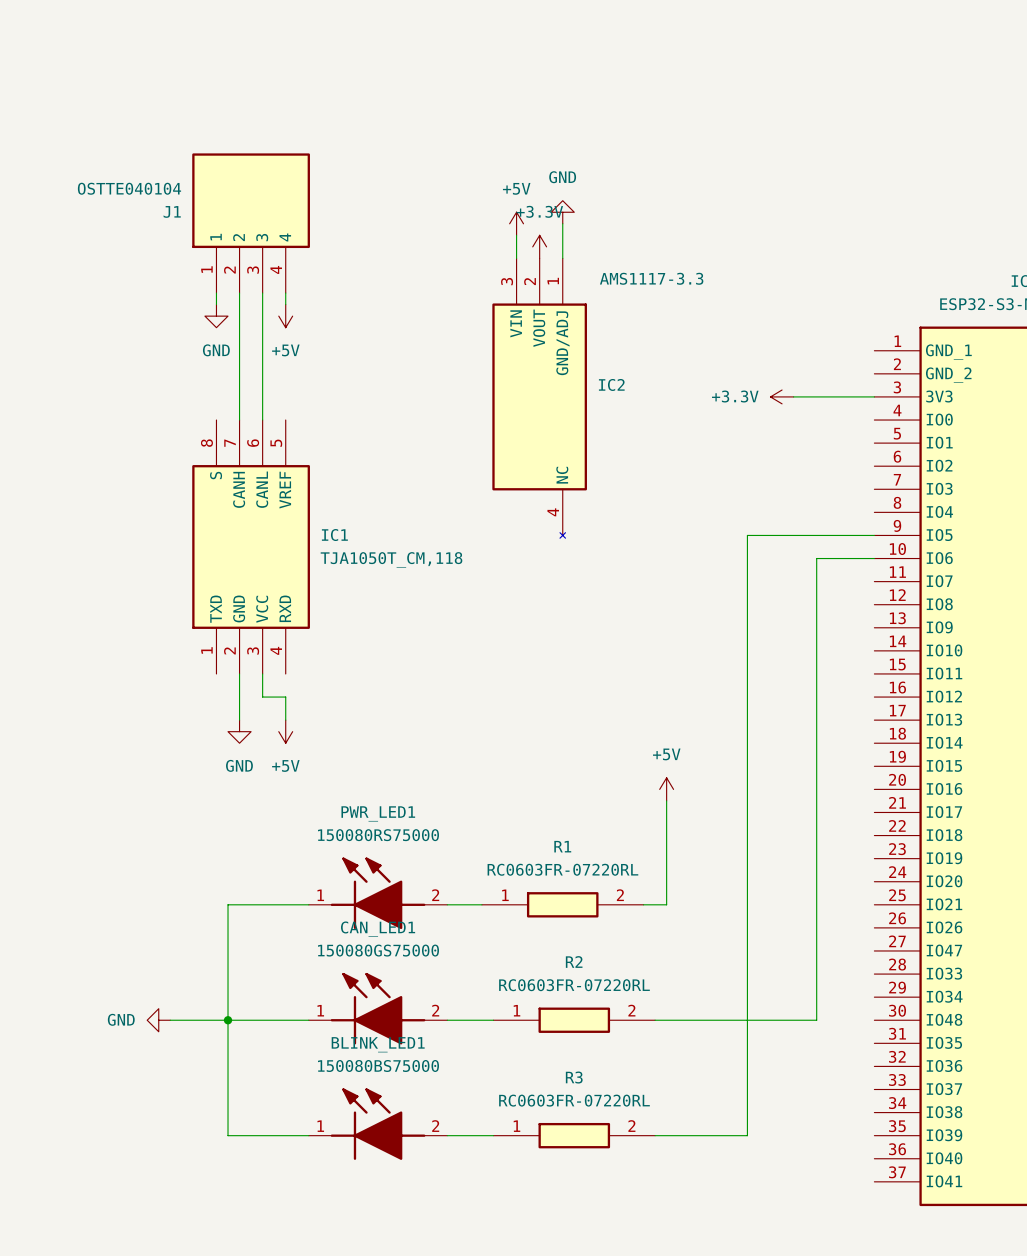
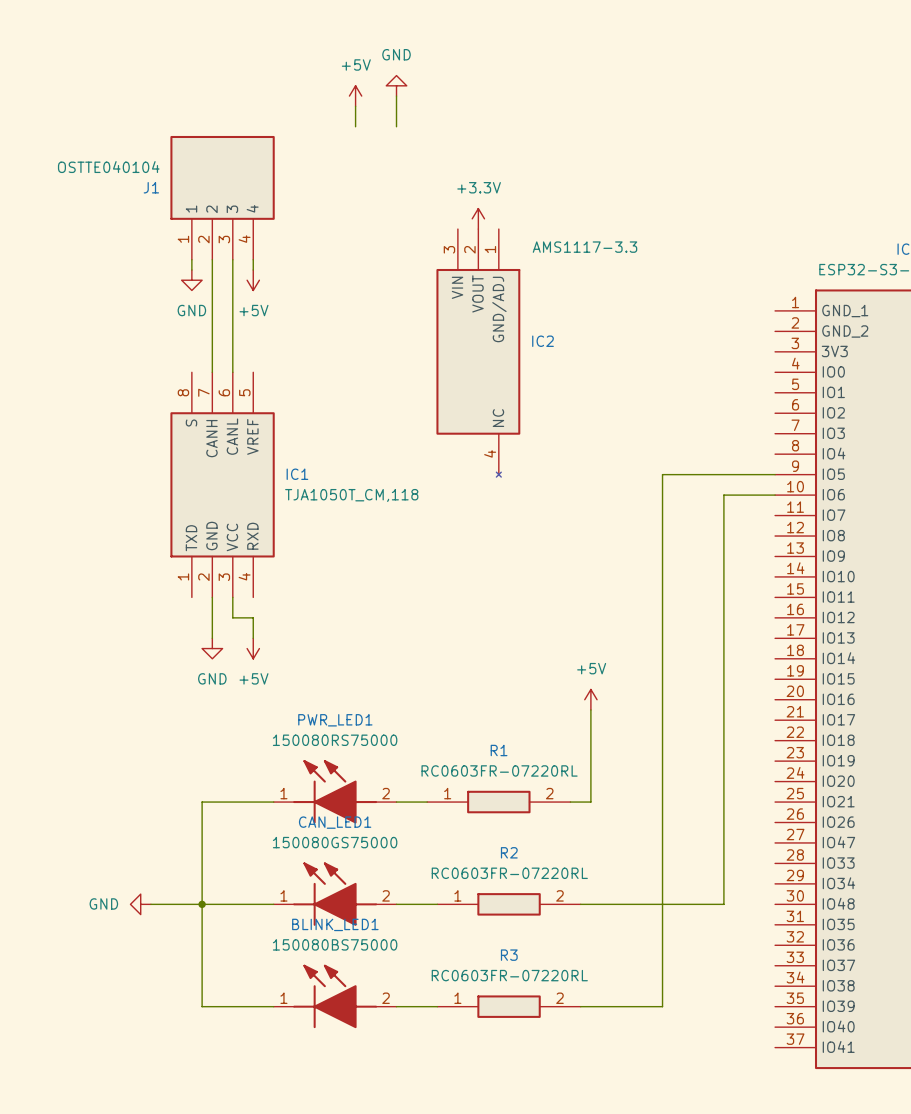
power symbol position: GND (562, 212) -> GND (396, 85)
power symbol position: +5V (516, 223) -> +5V (355, 96)
wire: (562, 223) (562, 258) -> (396, 96) (396, 126)
wire: (516, 235) (516, 258) -> (355, 106) (355, 126)
power symbol: +3.3V (782, 396) -> none
wire: (793, 396) (874, 396) -> none

